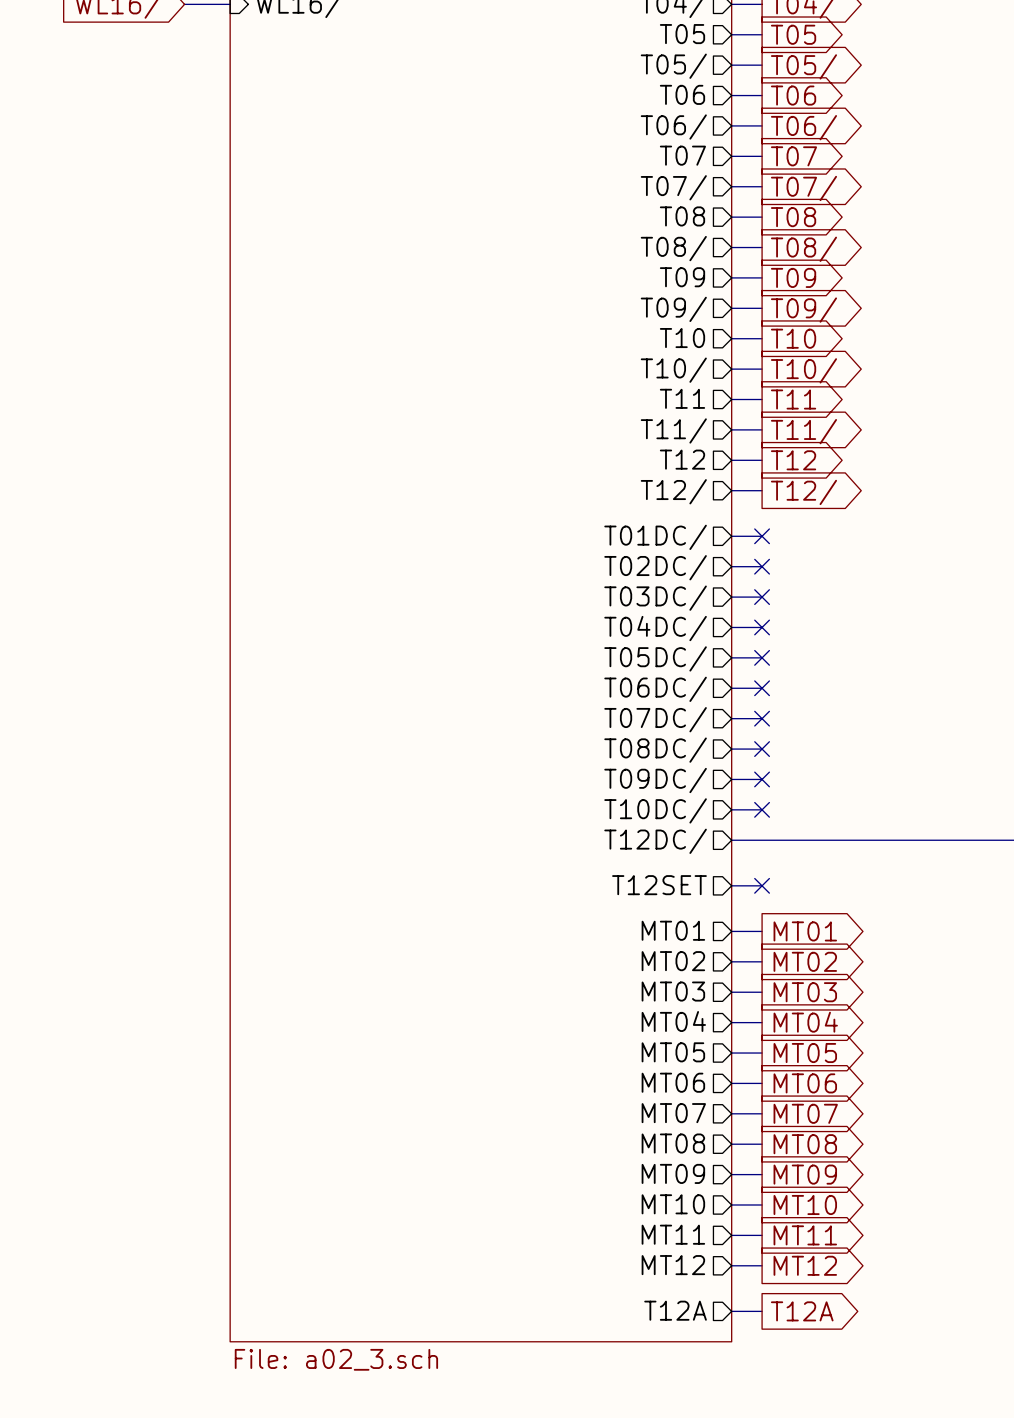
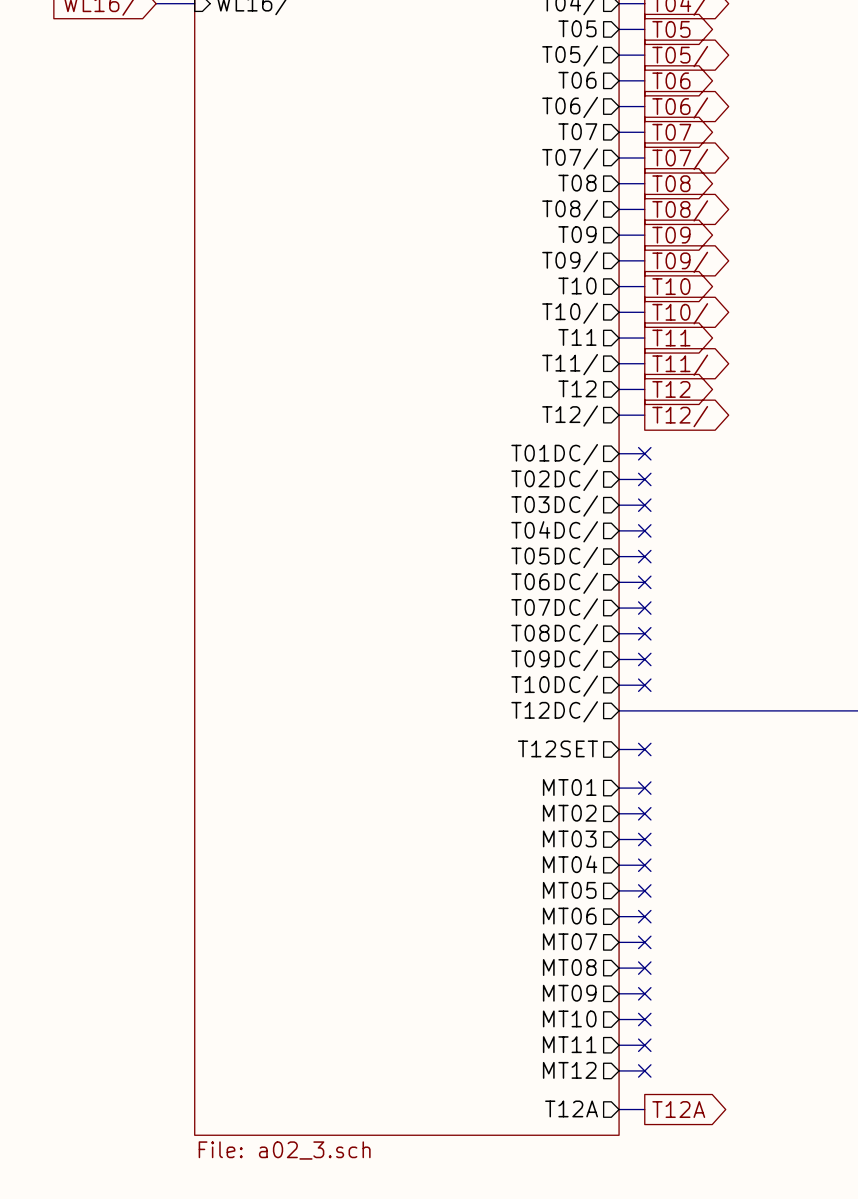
no-connect mark: none -> (644, 788)
global label: MT01 (805, 931) -> none
no-connect mark: none -> (644, 813)
global label: MT02 (805, 961) -> none
no-connect mark: none -> (644, 839)
global label: MT03 (805, 992) -> none
no-connect mark: none -> (644, 865)
global label: MT04 (805, 1022) -> none
no-connect mark: none -> (644, 890)
global label: MT05 (805, 1053) -> none
no-connect mark: none -> (644, 916)
global label: MT06 (805, 1083) -> none
no-connect mark: none -> (644, 942)
global label: MT07 (805, 1113) -> none
no-connect mark: none -> (644, 968)
global label: MT08 (805, 1144) -> none
no-connect mark: none -> (644, 993)
global label: MT09 (805, 1174) -> none
no-connect mark: none -> (644, 1019)
global label: MT10 (805, 1204) -> none
no-connect mark: none -> (644, 1045)
global label: MT11 (805, 1235) -> none
no-connect mark: none -> (644, 1070)
global label: MT12 (805, 1265) -> none

